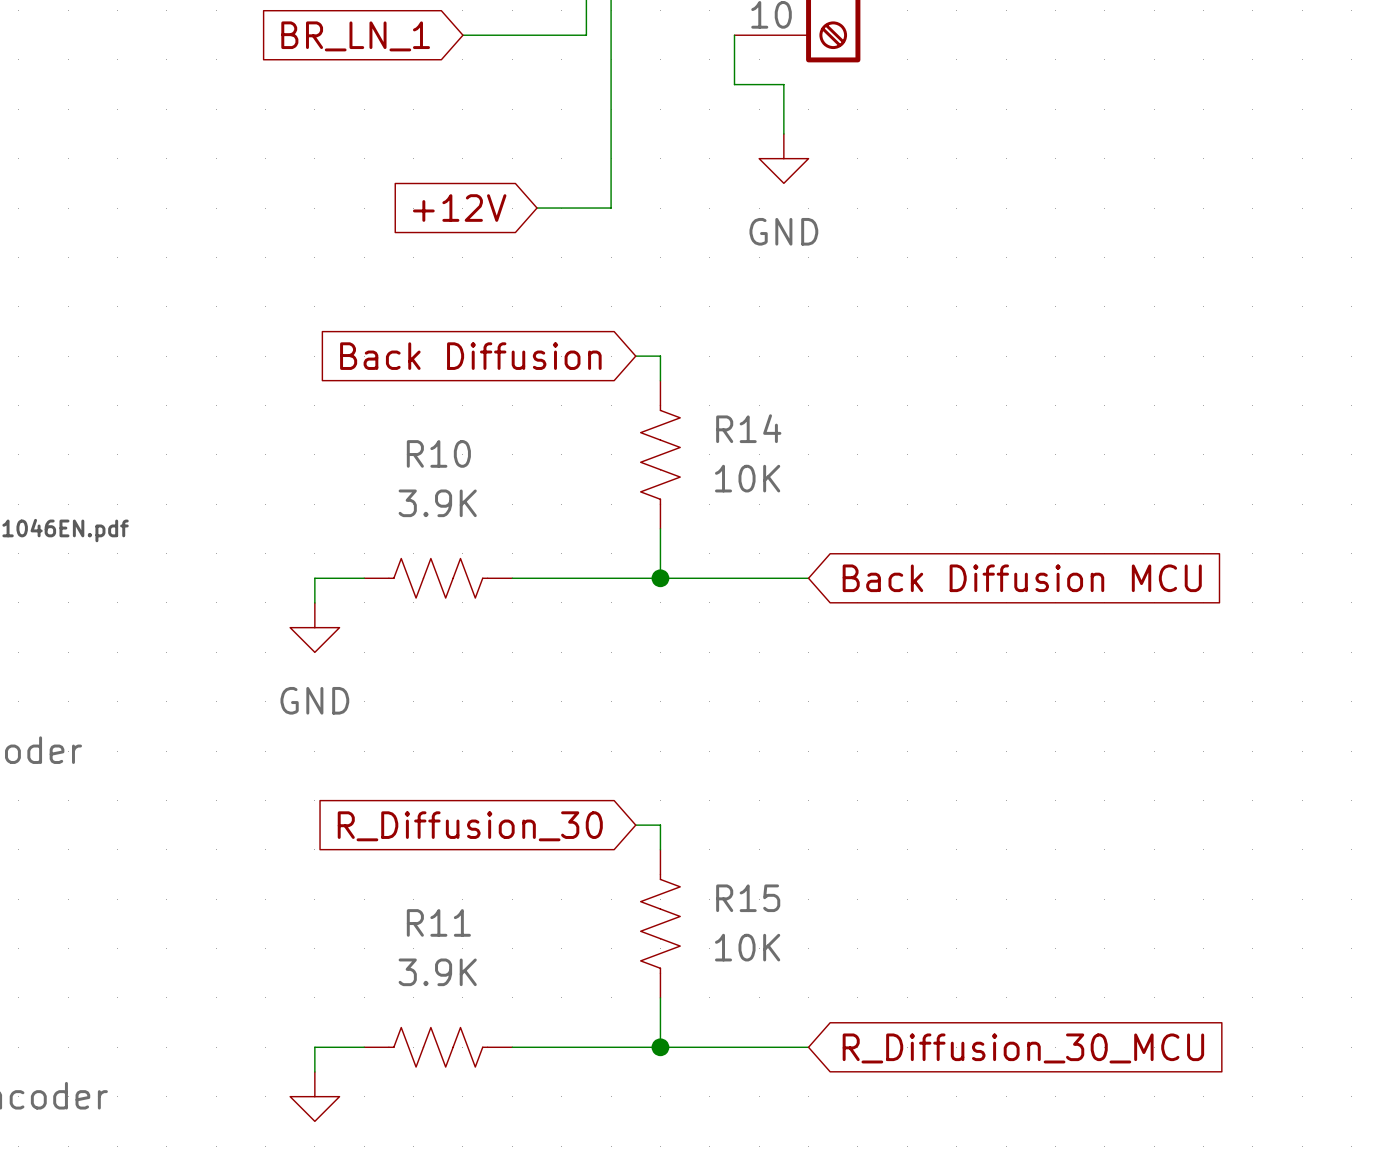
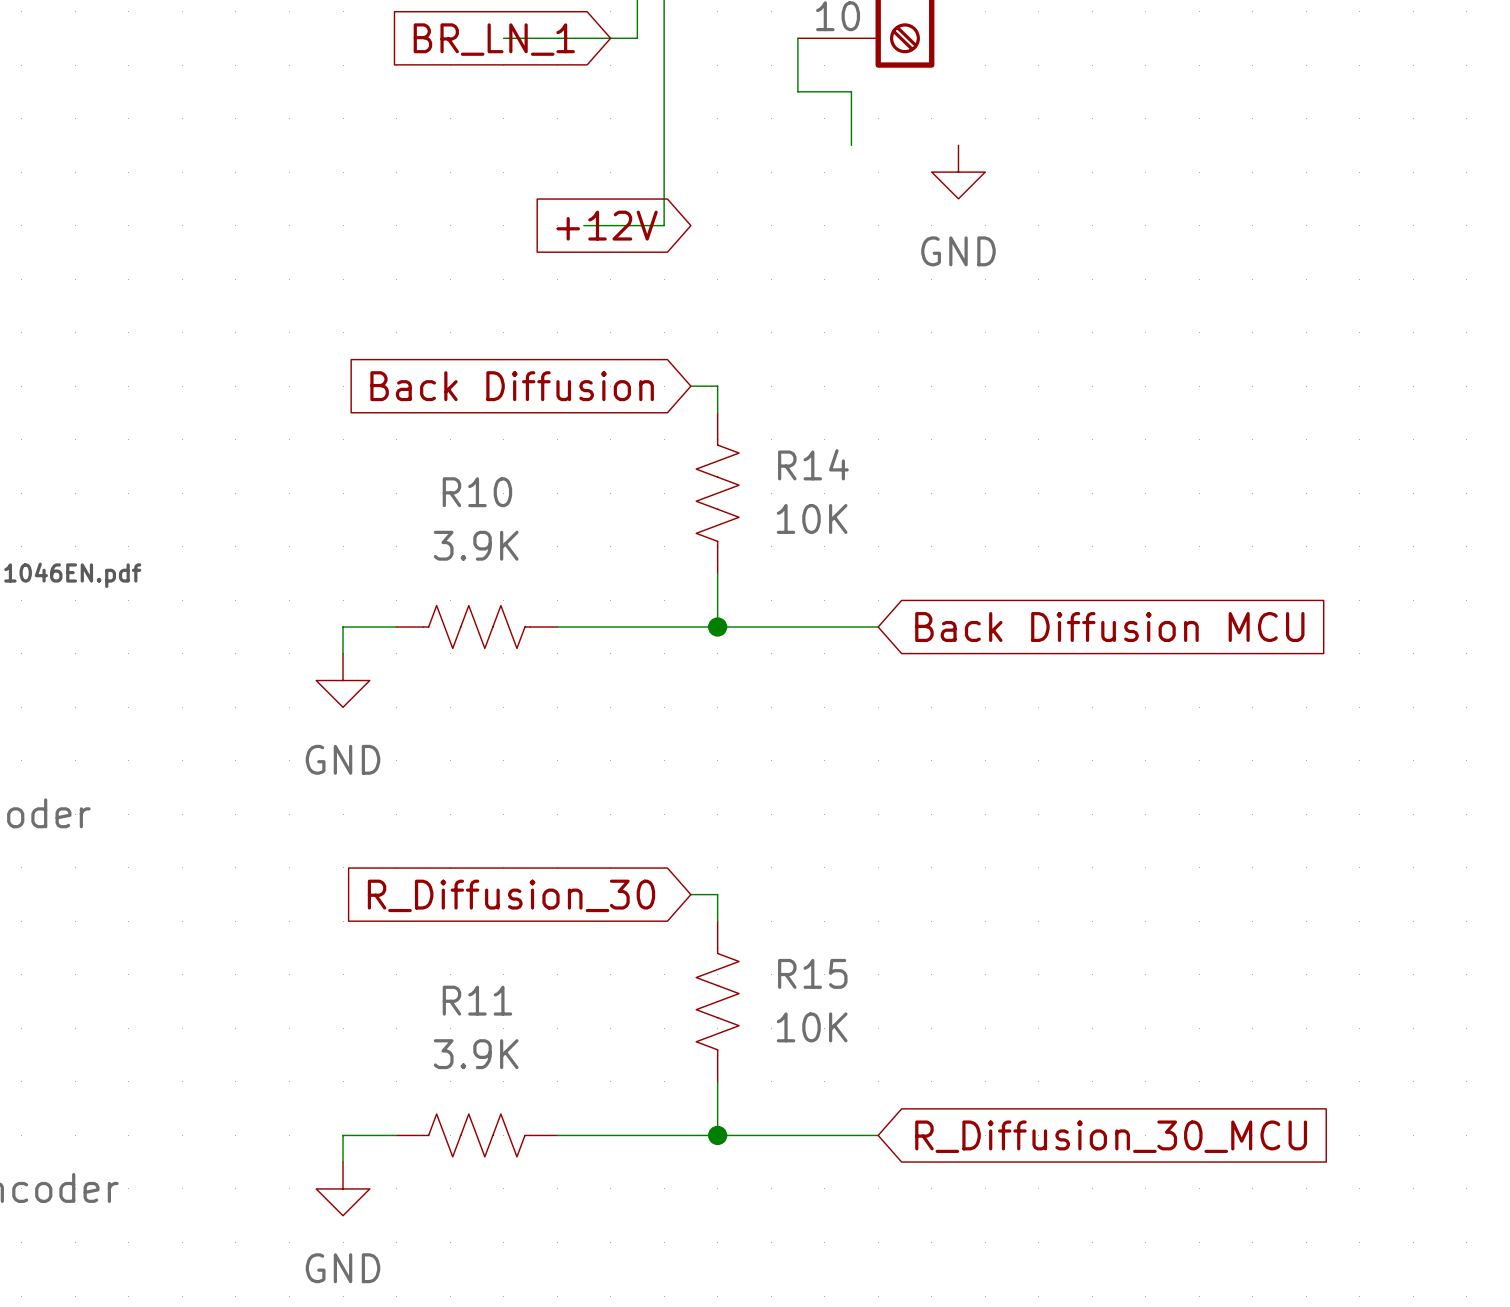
global label position: BR_LN_1 (355, 36) -> BR_LN_1 (494, 39)
power symbol position: GND (783, 158) -> GND (958, 172)
global label position: +12V (459, 208) -> +12V (607, 225)

